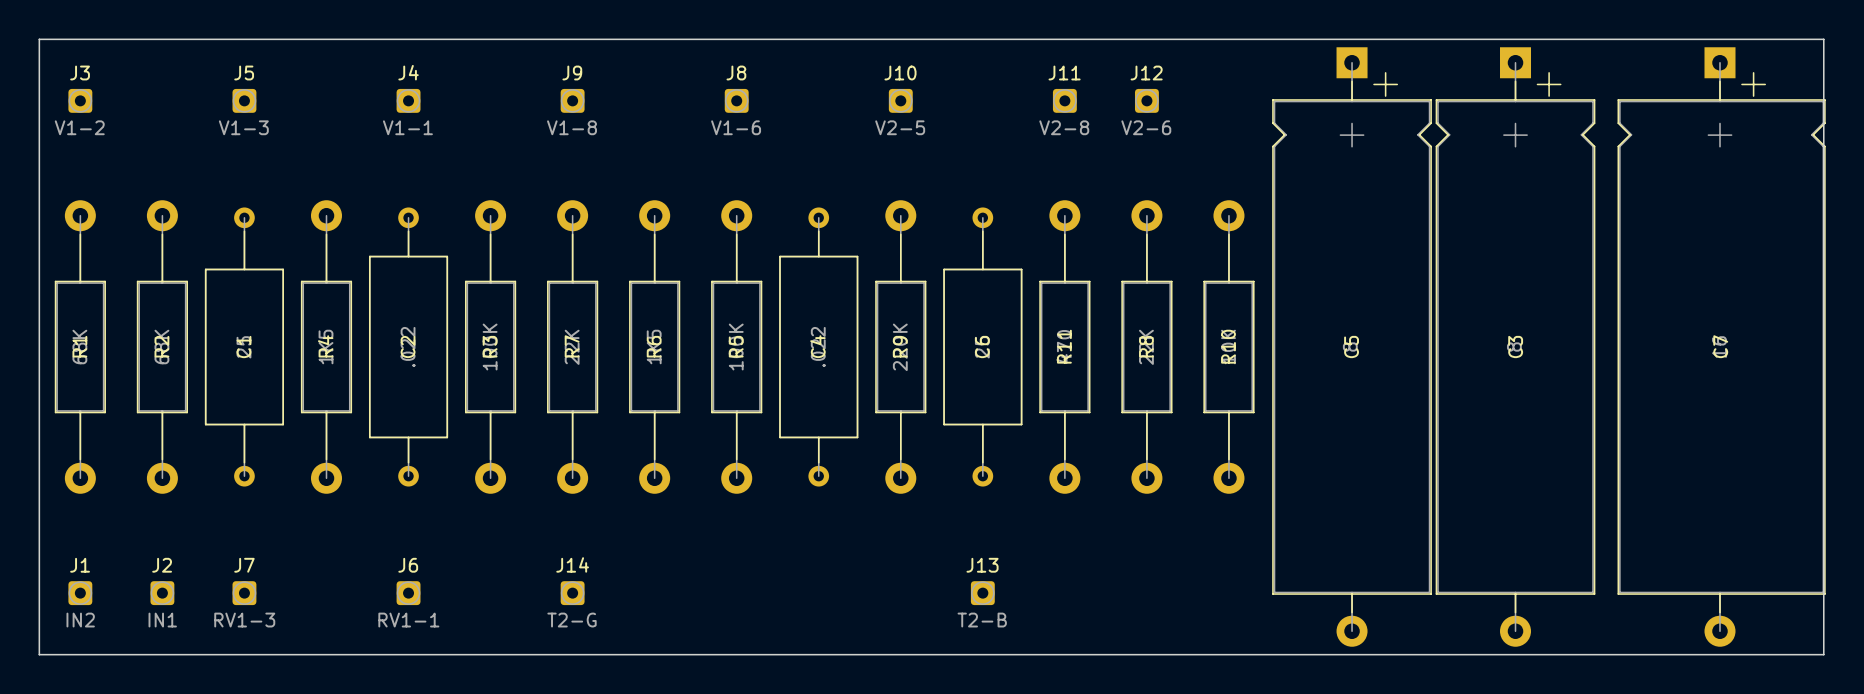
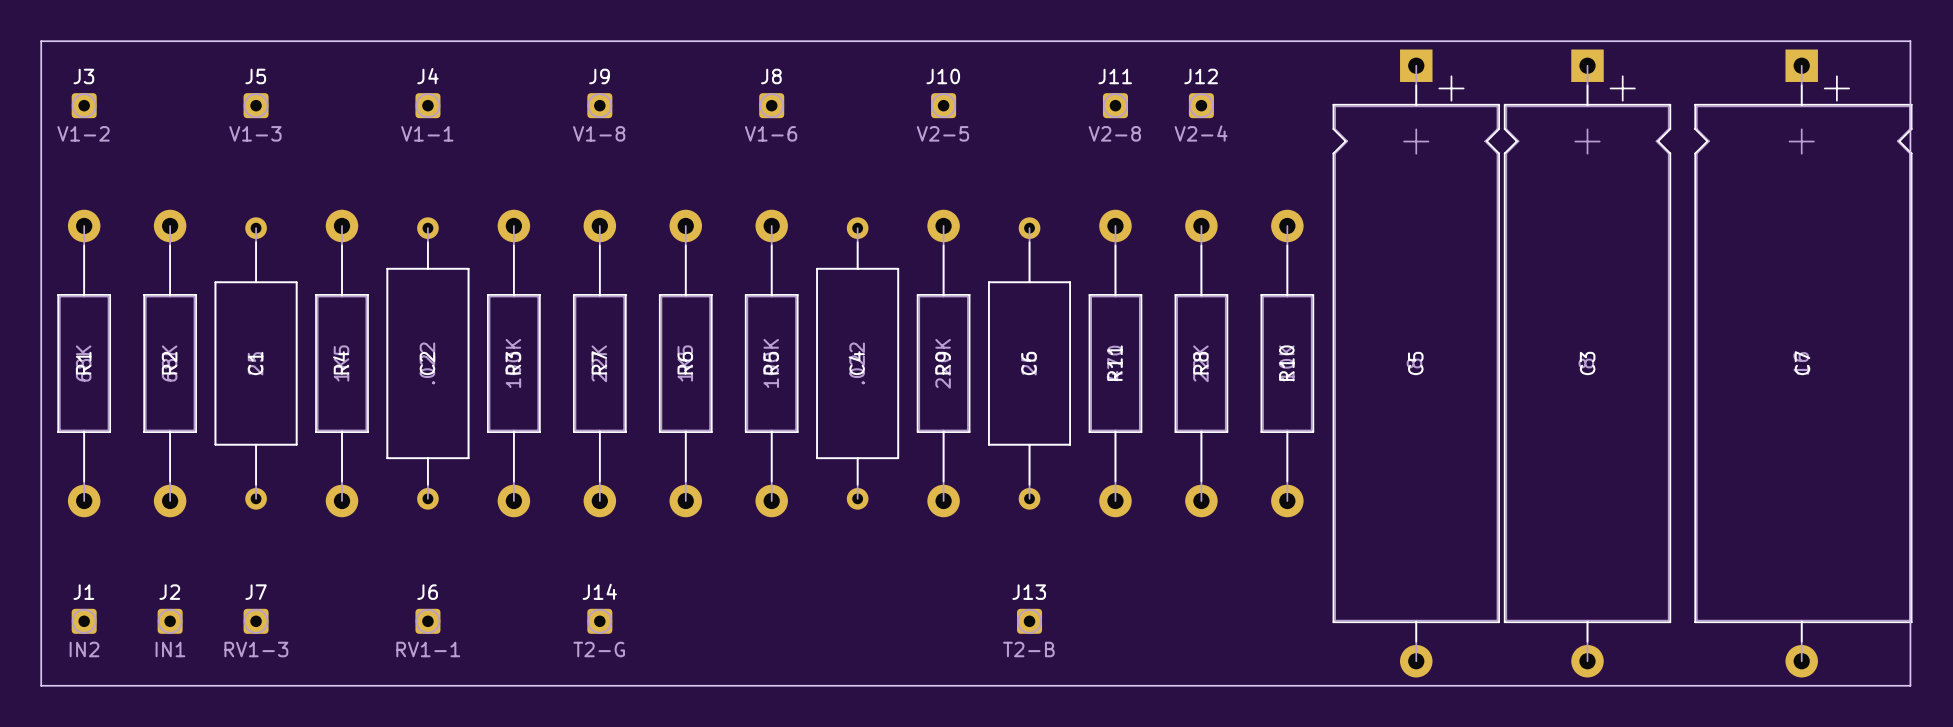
J12 value: V2-6 (1146, 127) -> V2-4 (1201, 133)

